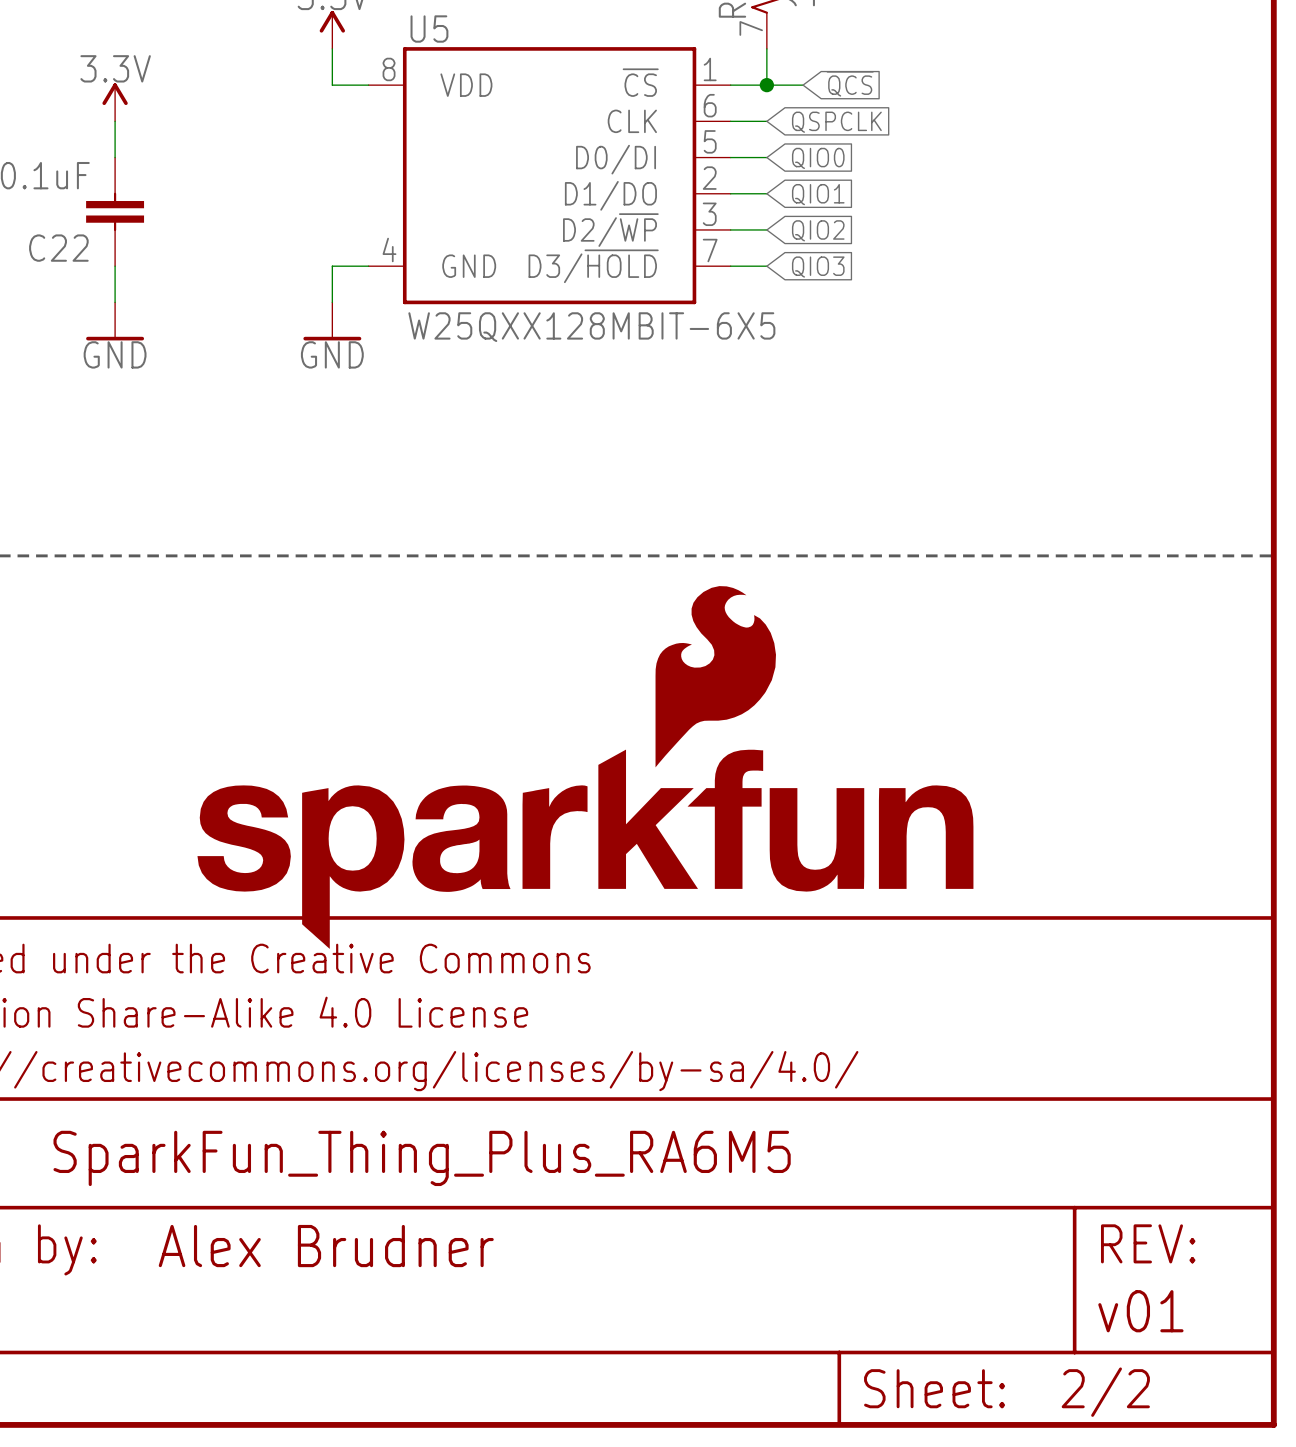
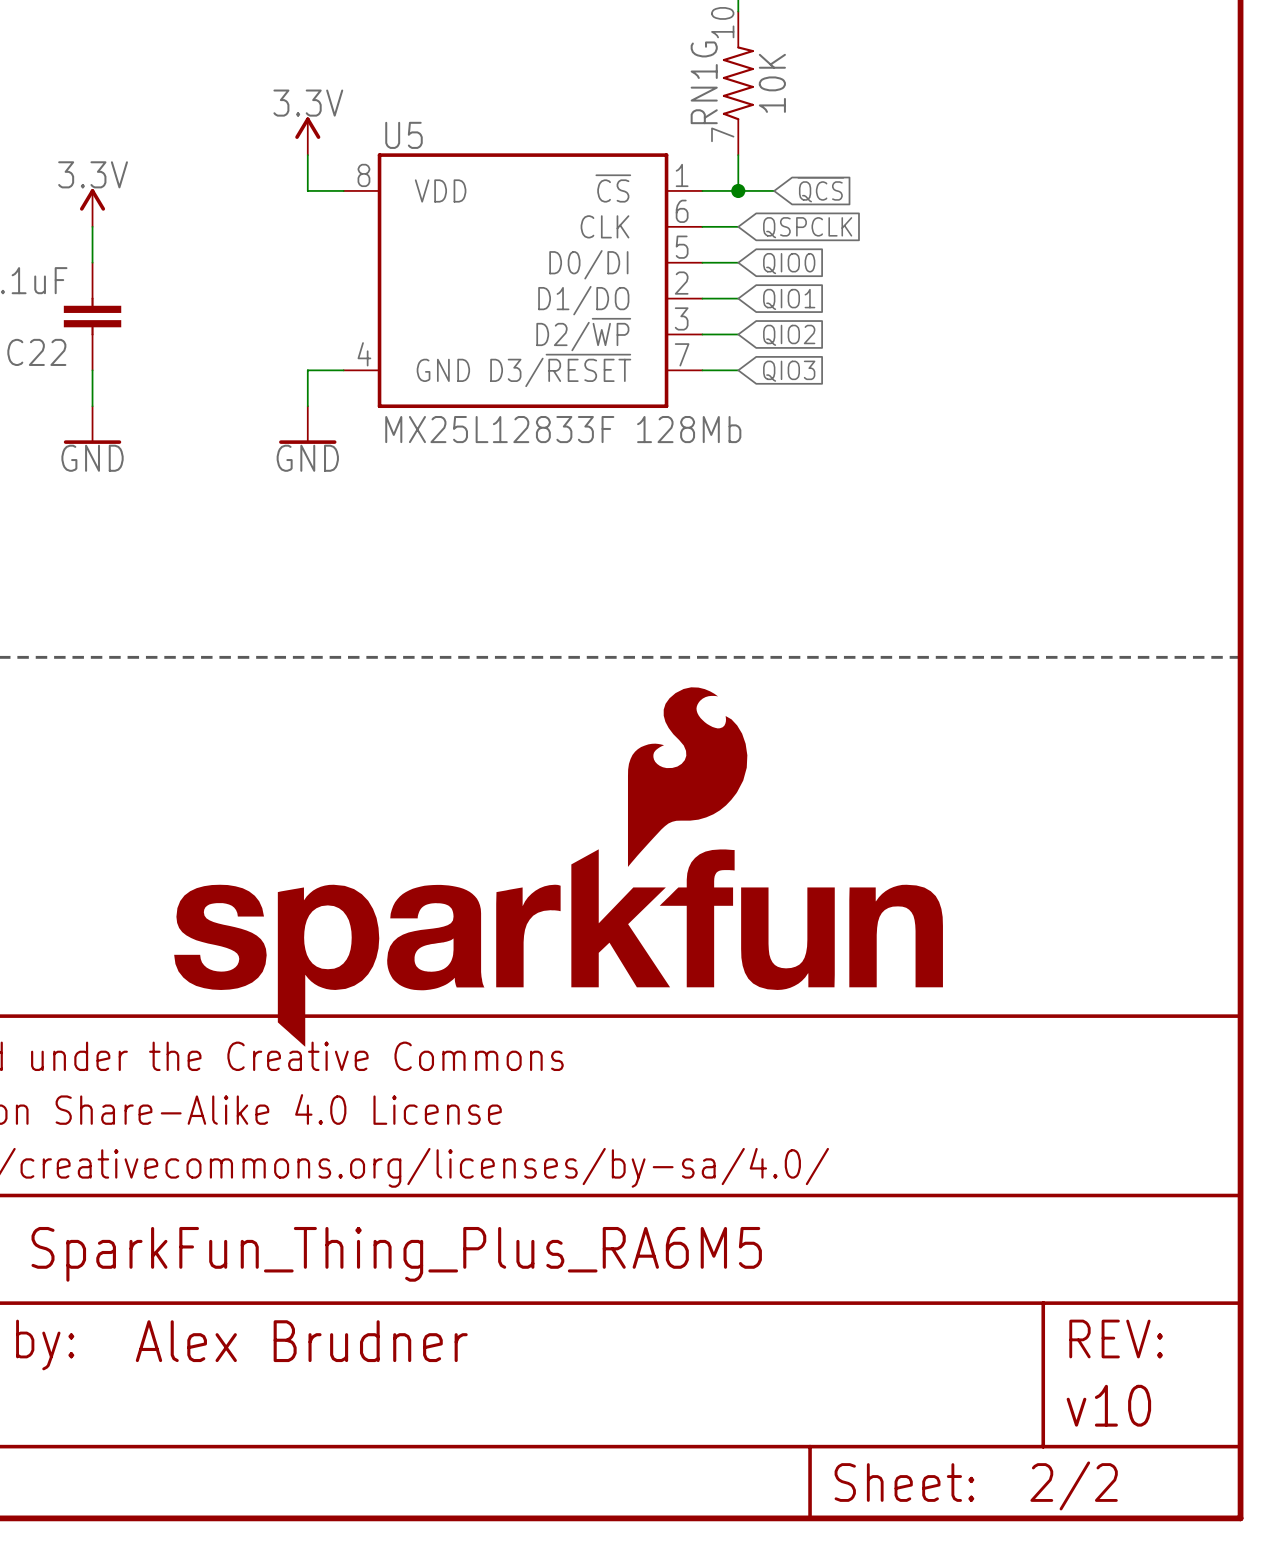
U5 pin name: D3/~{HOLD} (593, 266) -> D3/~{RESET} (560, 370)
U5 value: W25QXX128MBIT-6X5 (591, 327) -> MX25L12833F 128Mb (563, 429)
part text: v01 (1140, 1311) -> v10 (1108, 1405)

